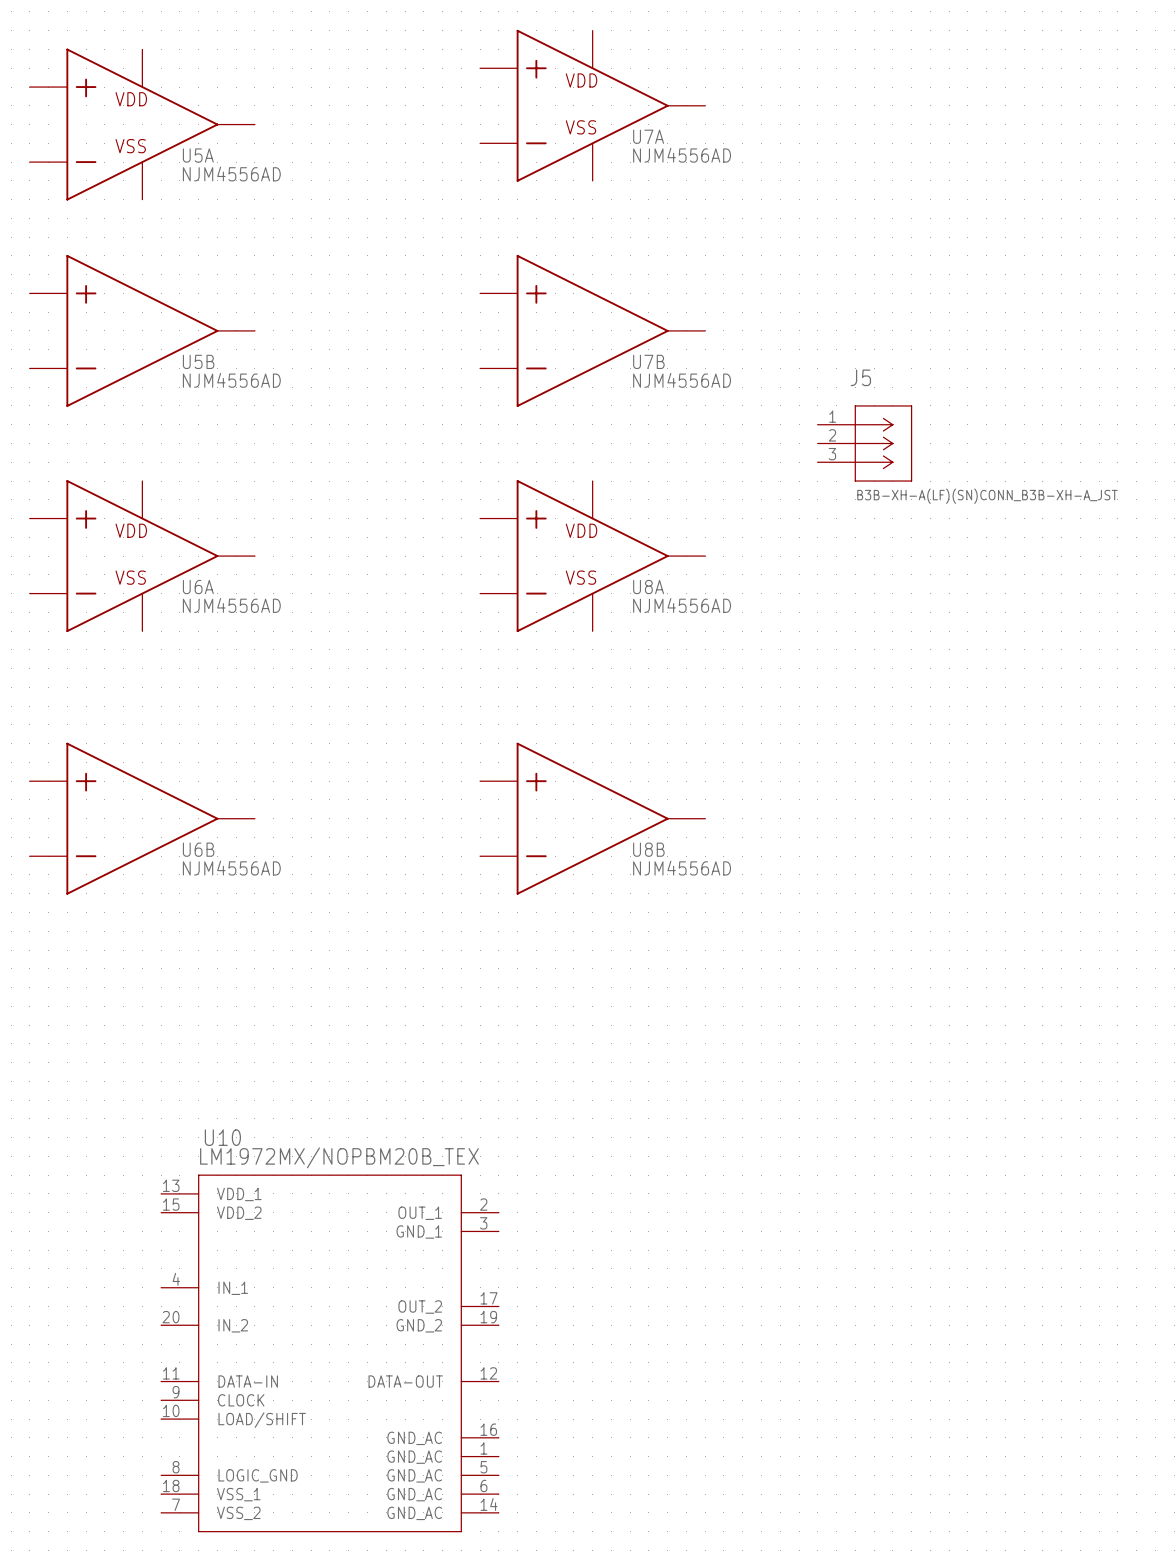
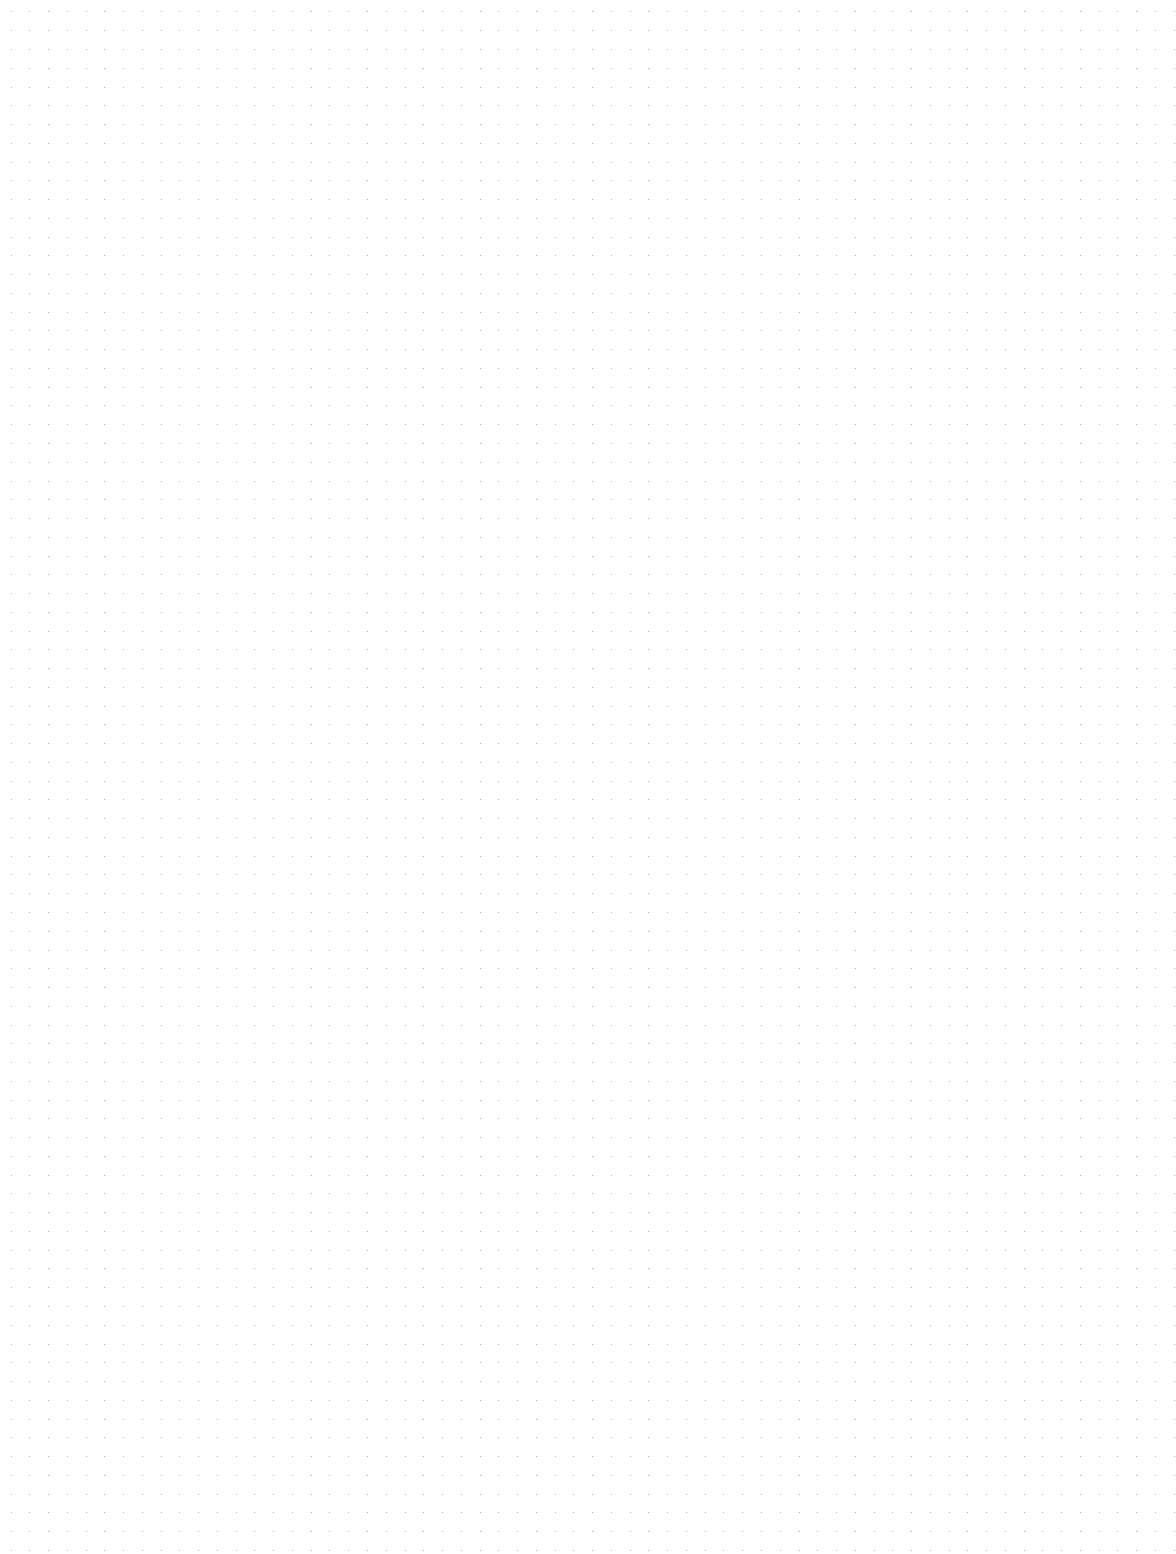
U7A: NJM4556AD (592, 105) -> none
U5A: NJM4556AD (142, 124) -> none
U5B: NJM4556AD (142, 330) -> none
U7B: NJM4556AD (592, 330) -> none
J5: B3B-XH-A(LF)(SN)CONN_B3B-XH-A_JST (864, 443) -> none
U6A: NJM4556AD (142, 556) -> none
U8A: NJM4556AD (592, 556) -> none
U6B: NJM4556AD (142, 818) -> none
U8B: NJM4556AD (592, 818) -> none
U10: LM1972MX/NOPBM20B_TEX (329, 1353) -> none

